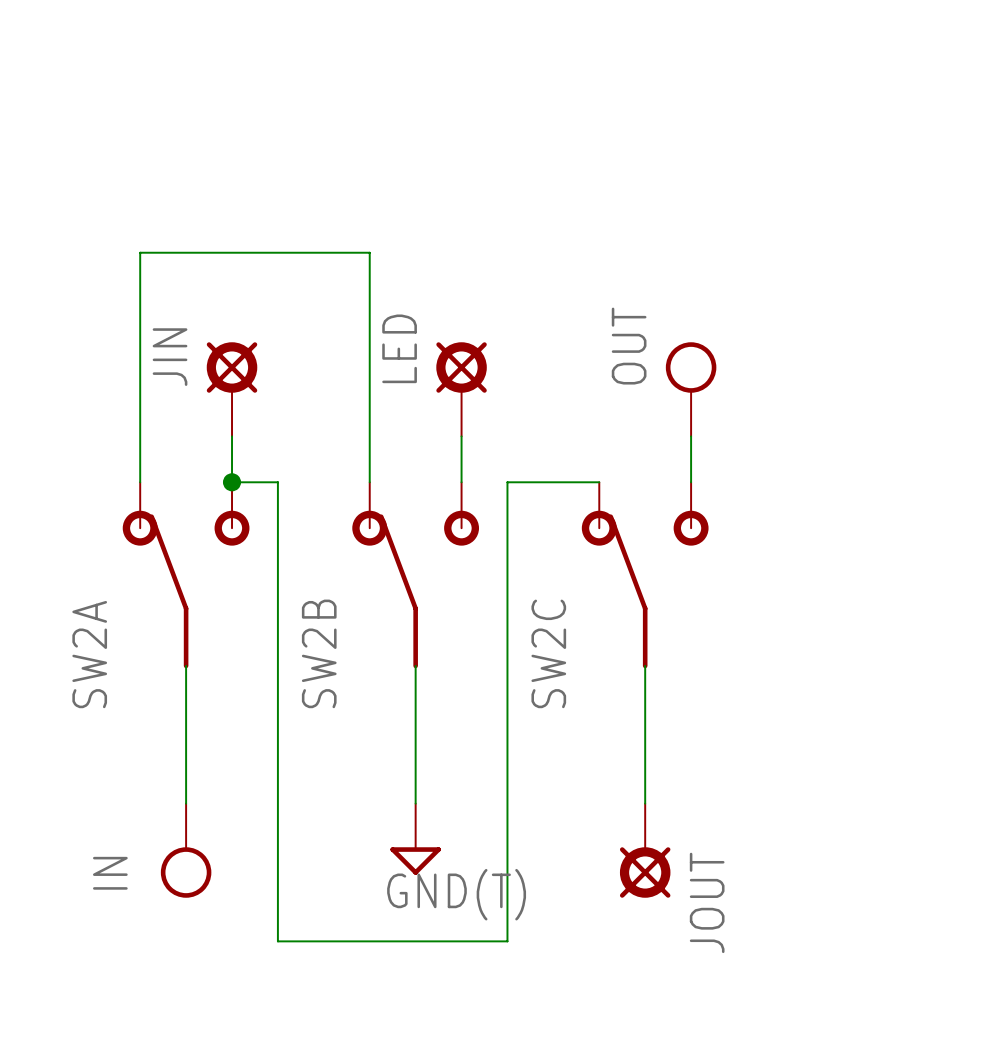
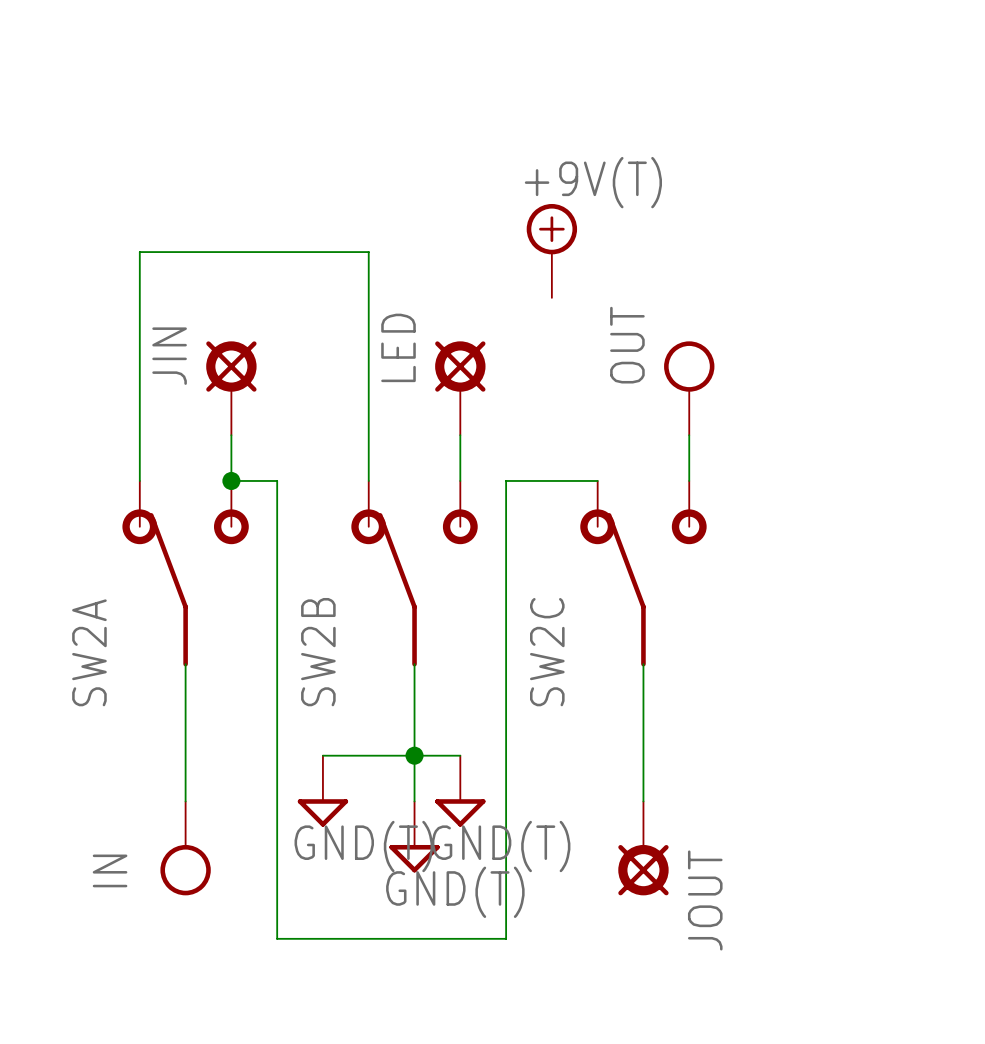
part: none -> +9V(T) (551, 250)
wire: none -> (322, 755) (460, 755)
junction: none -> (414, 755)
part: none -> GND(T) (322, 791)
part: none -> GND(T) (460, 791)

